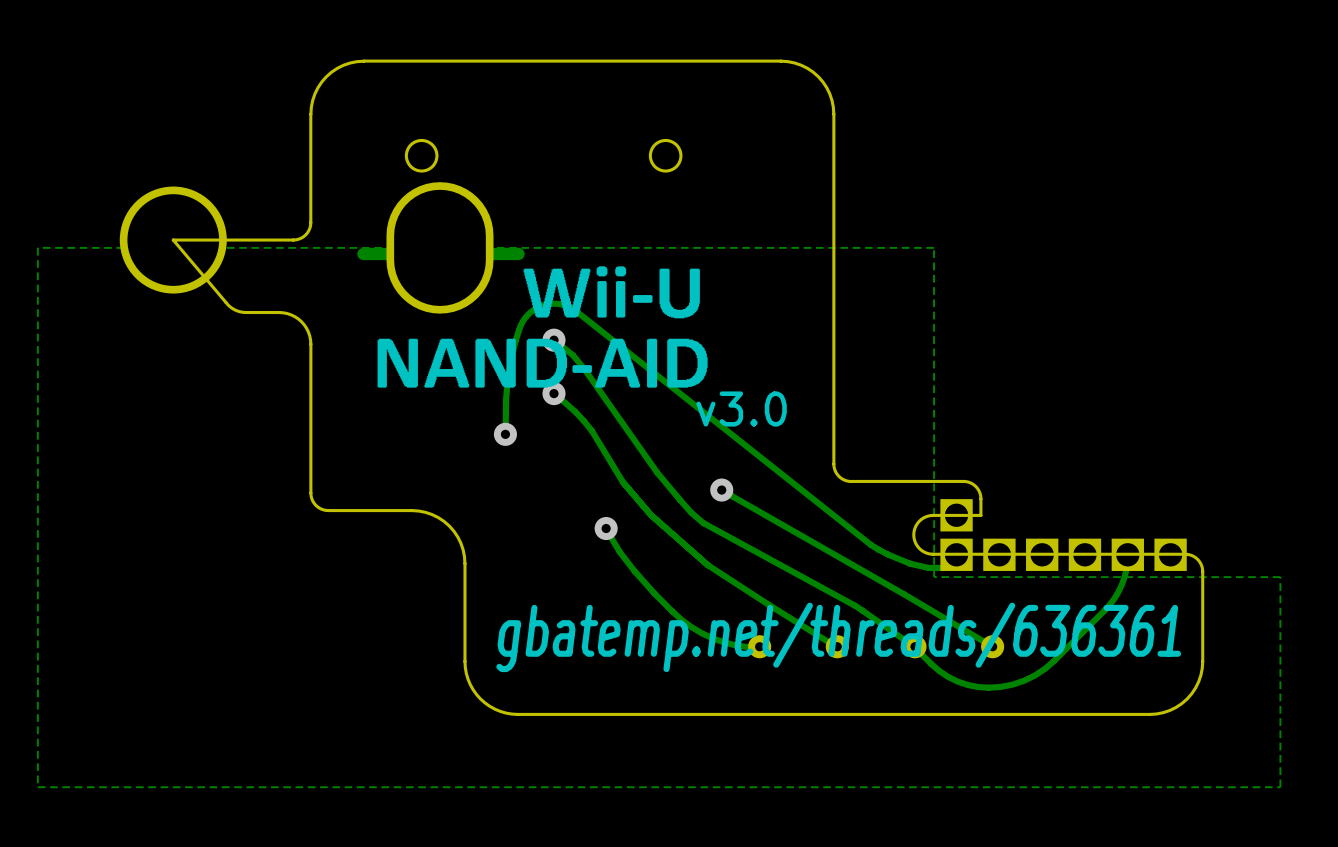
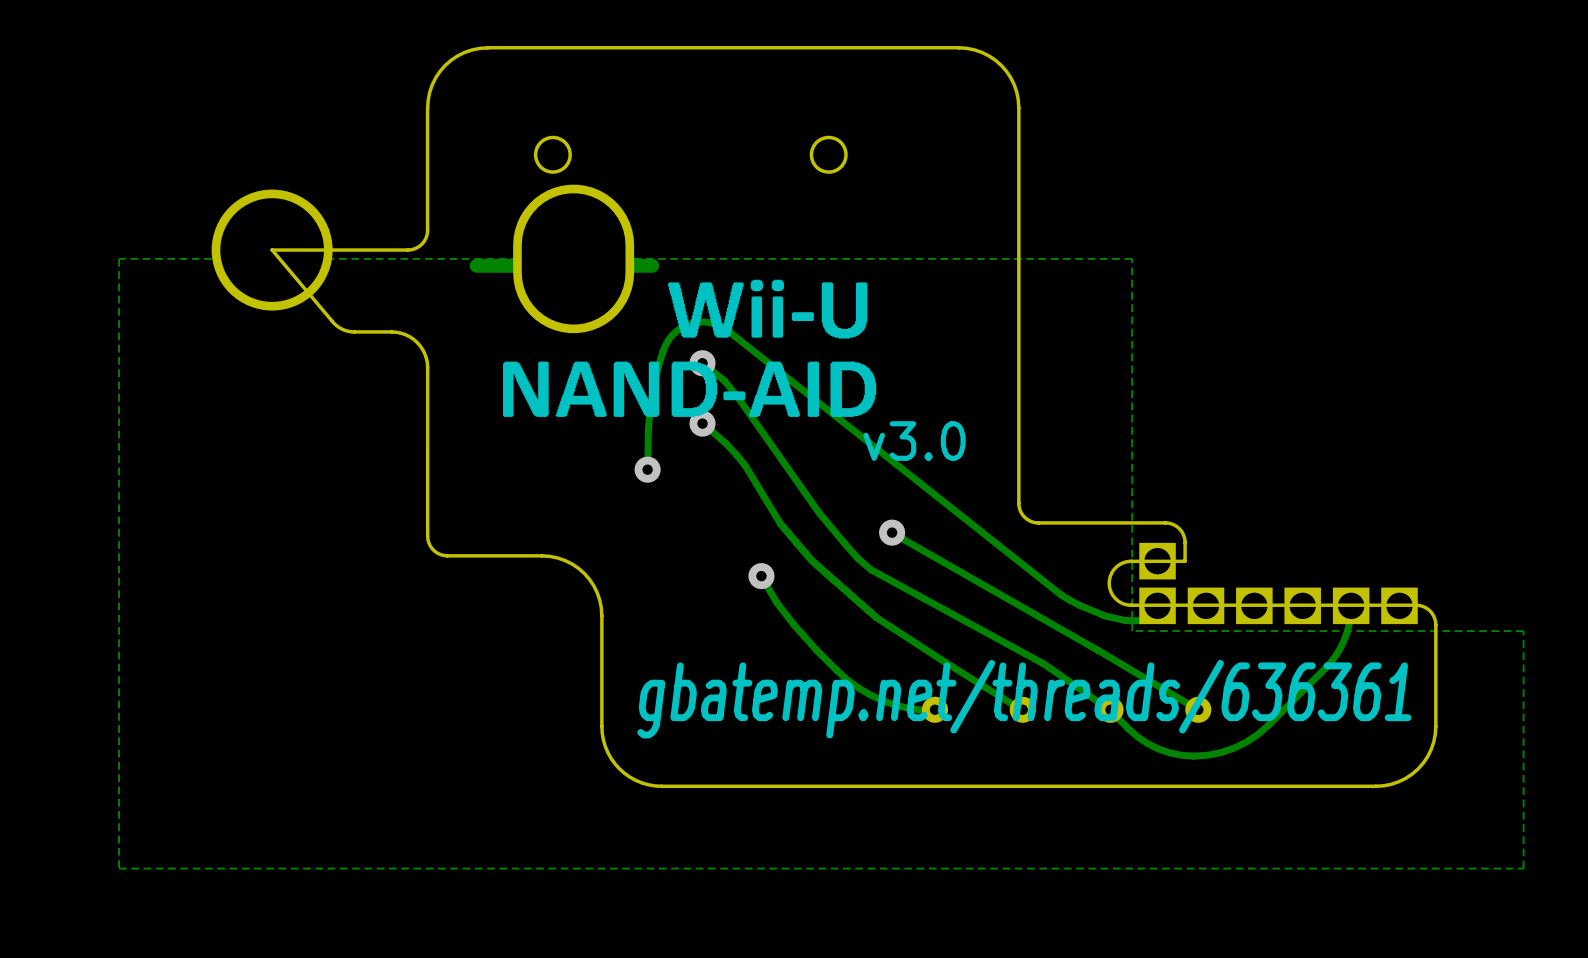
track: (518, 254) (509, 254) -> (486, 265) (476, 265)

